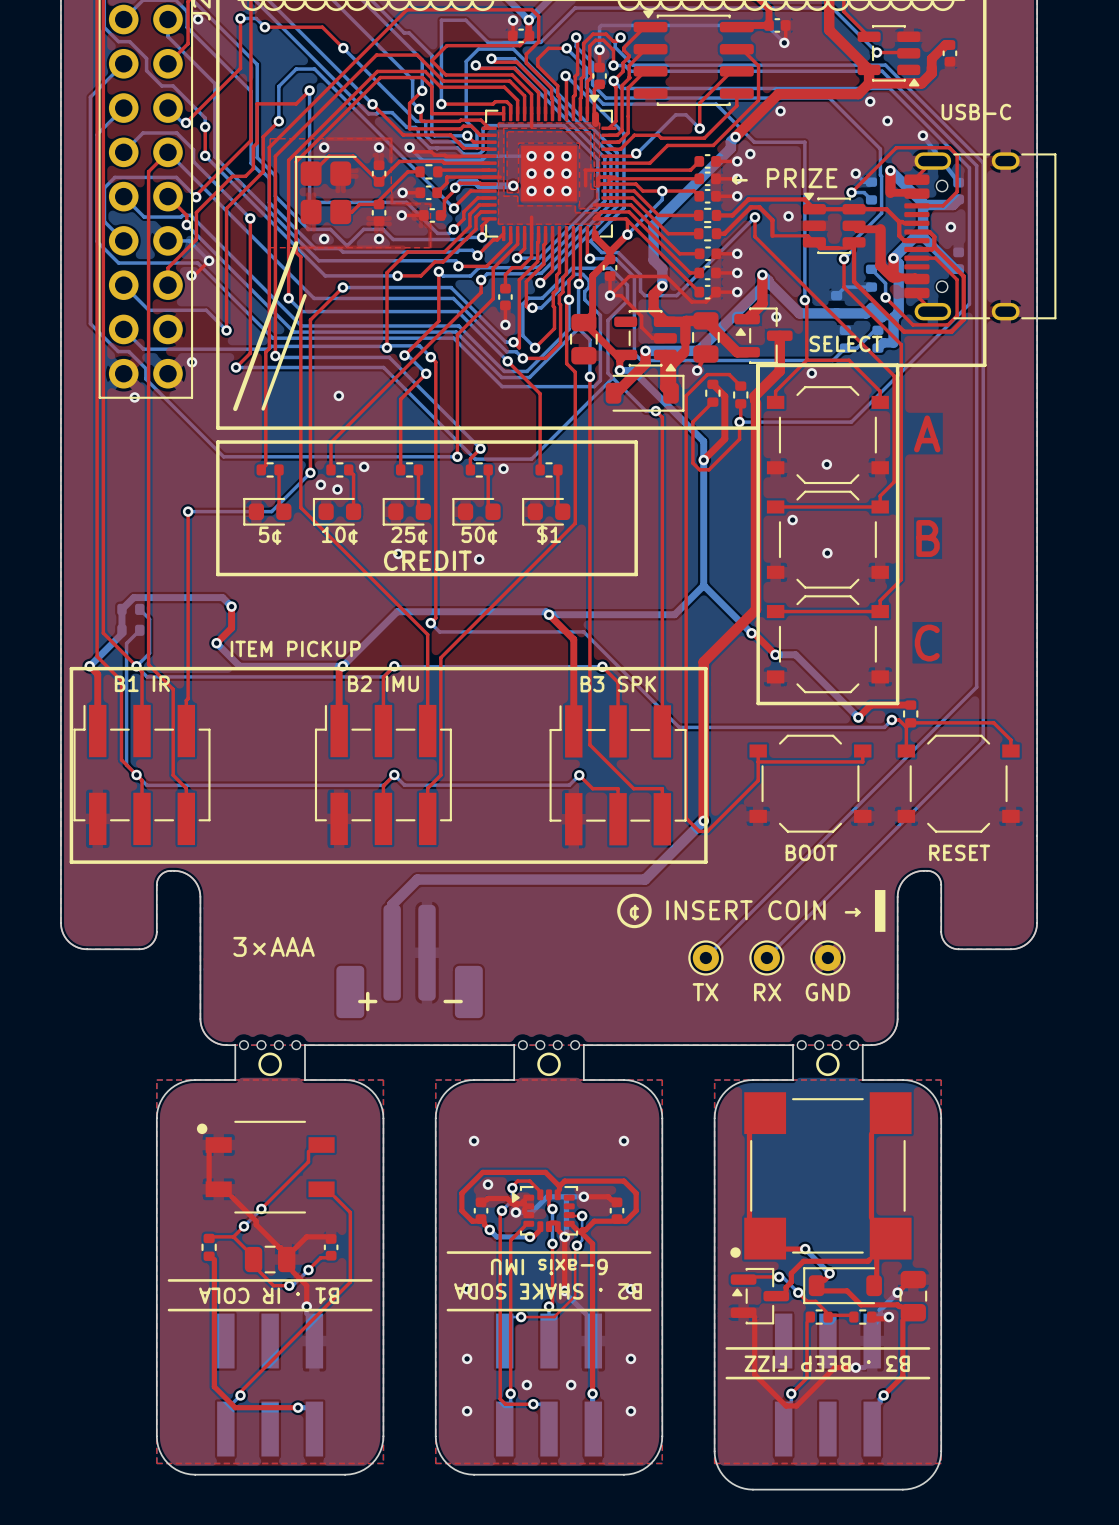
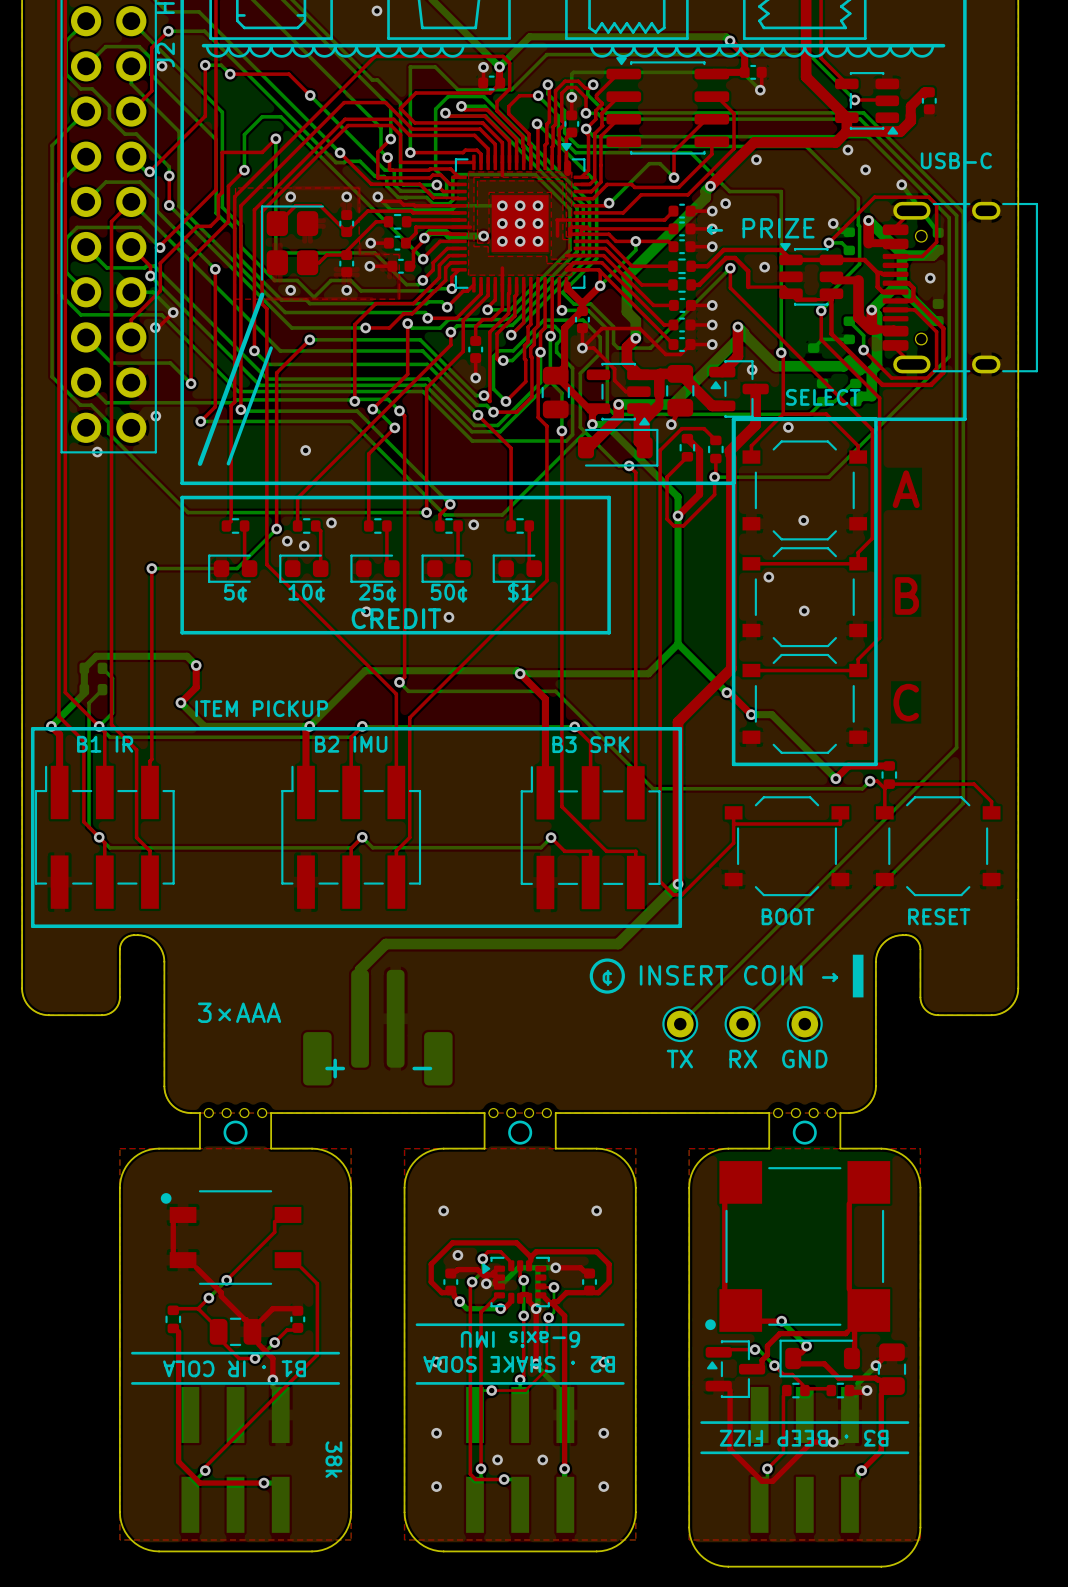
text: none -> 38k (333, 1459)

